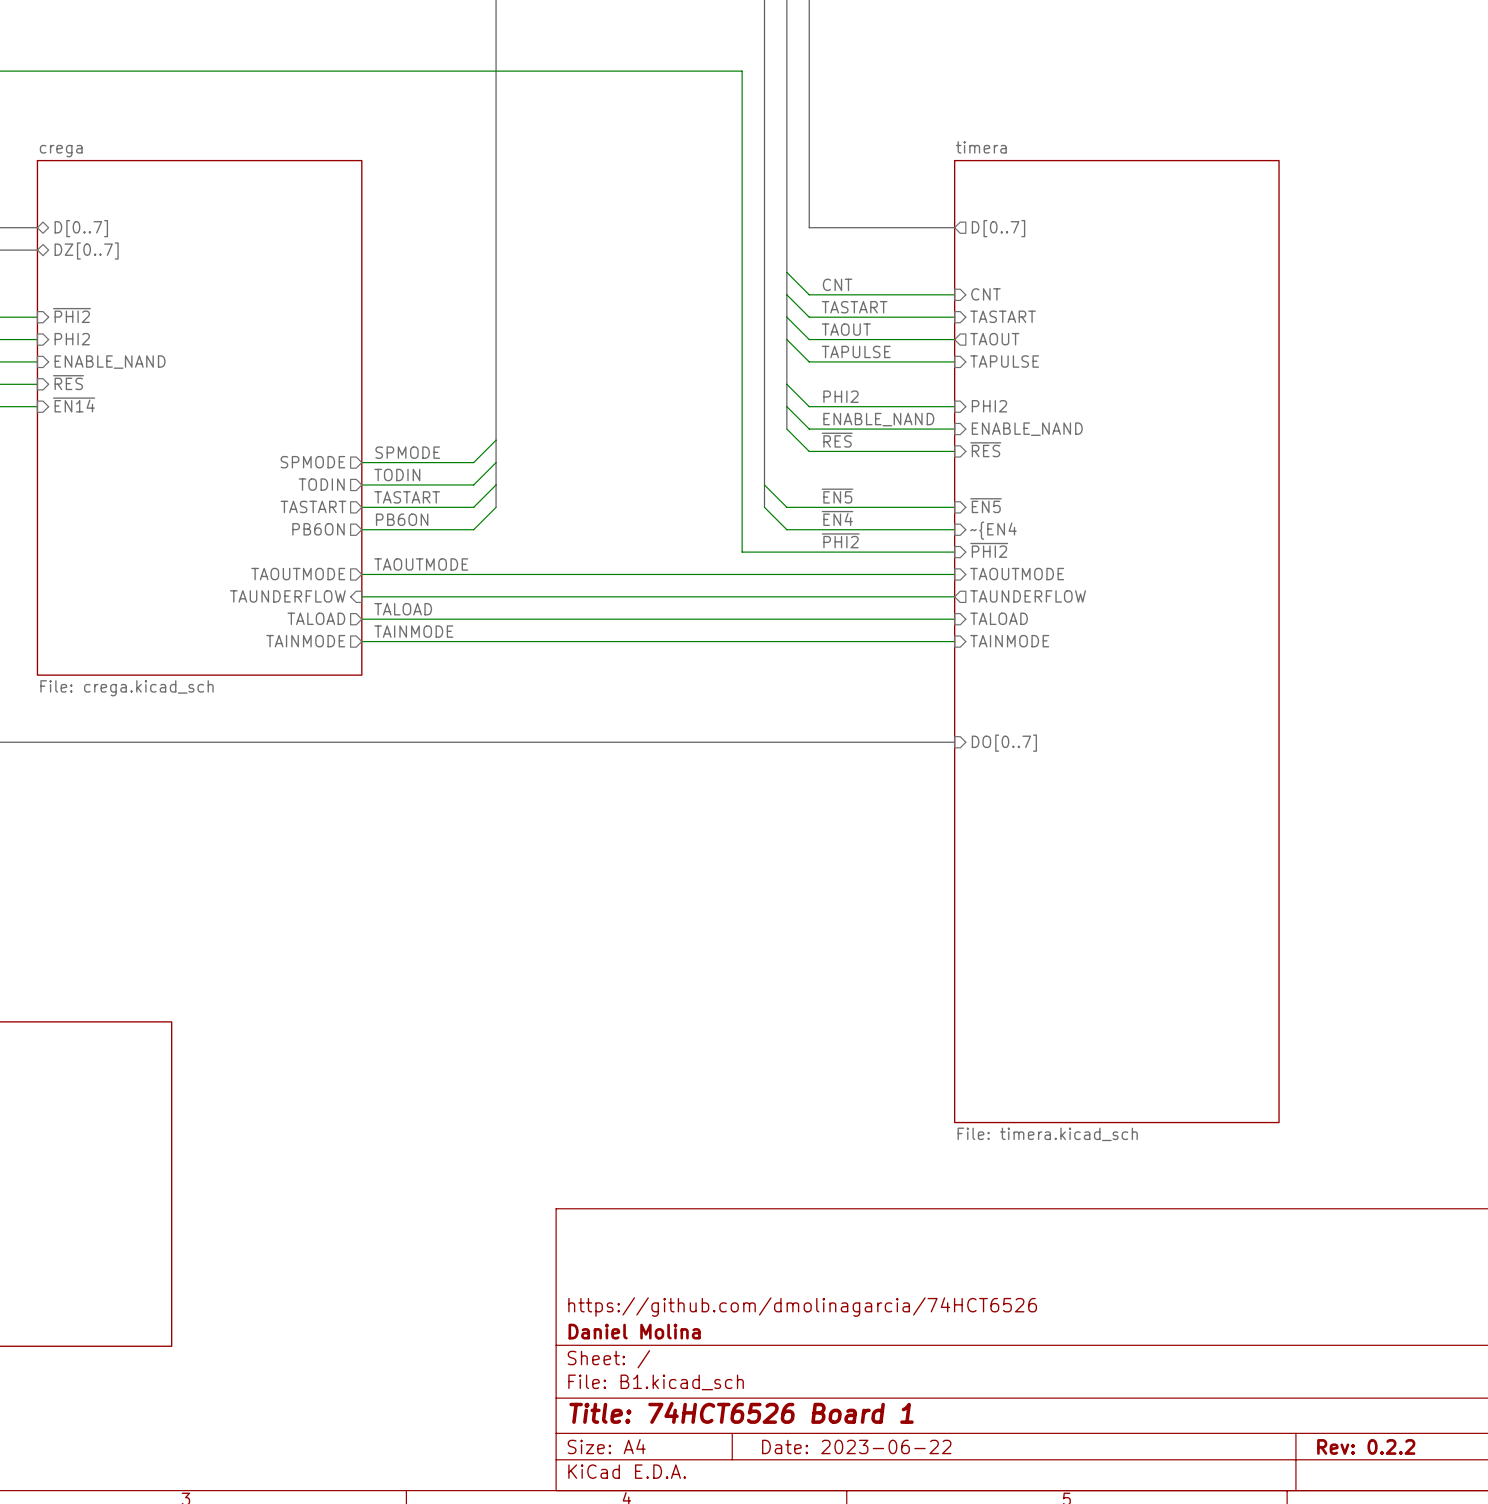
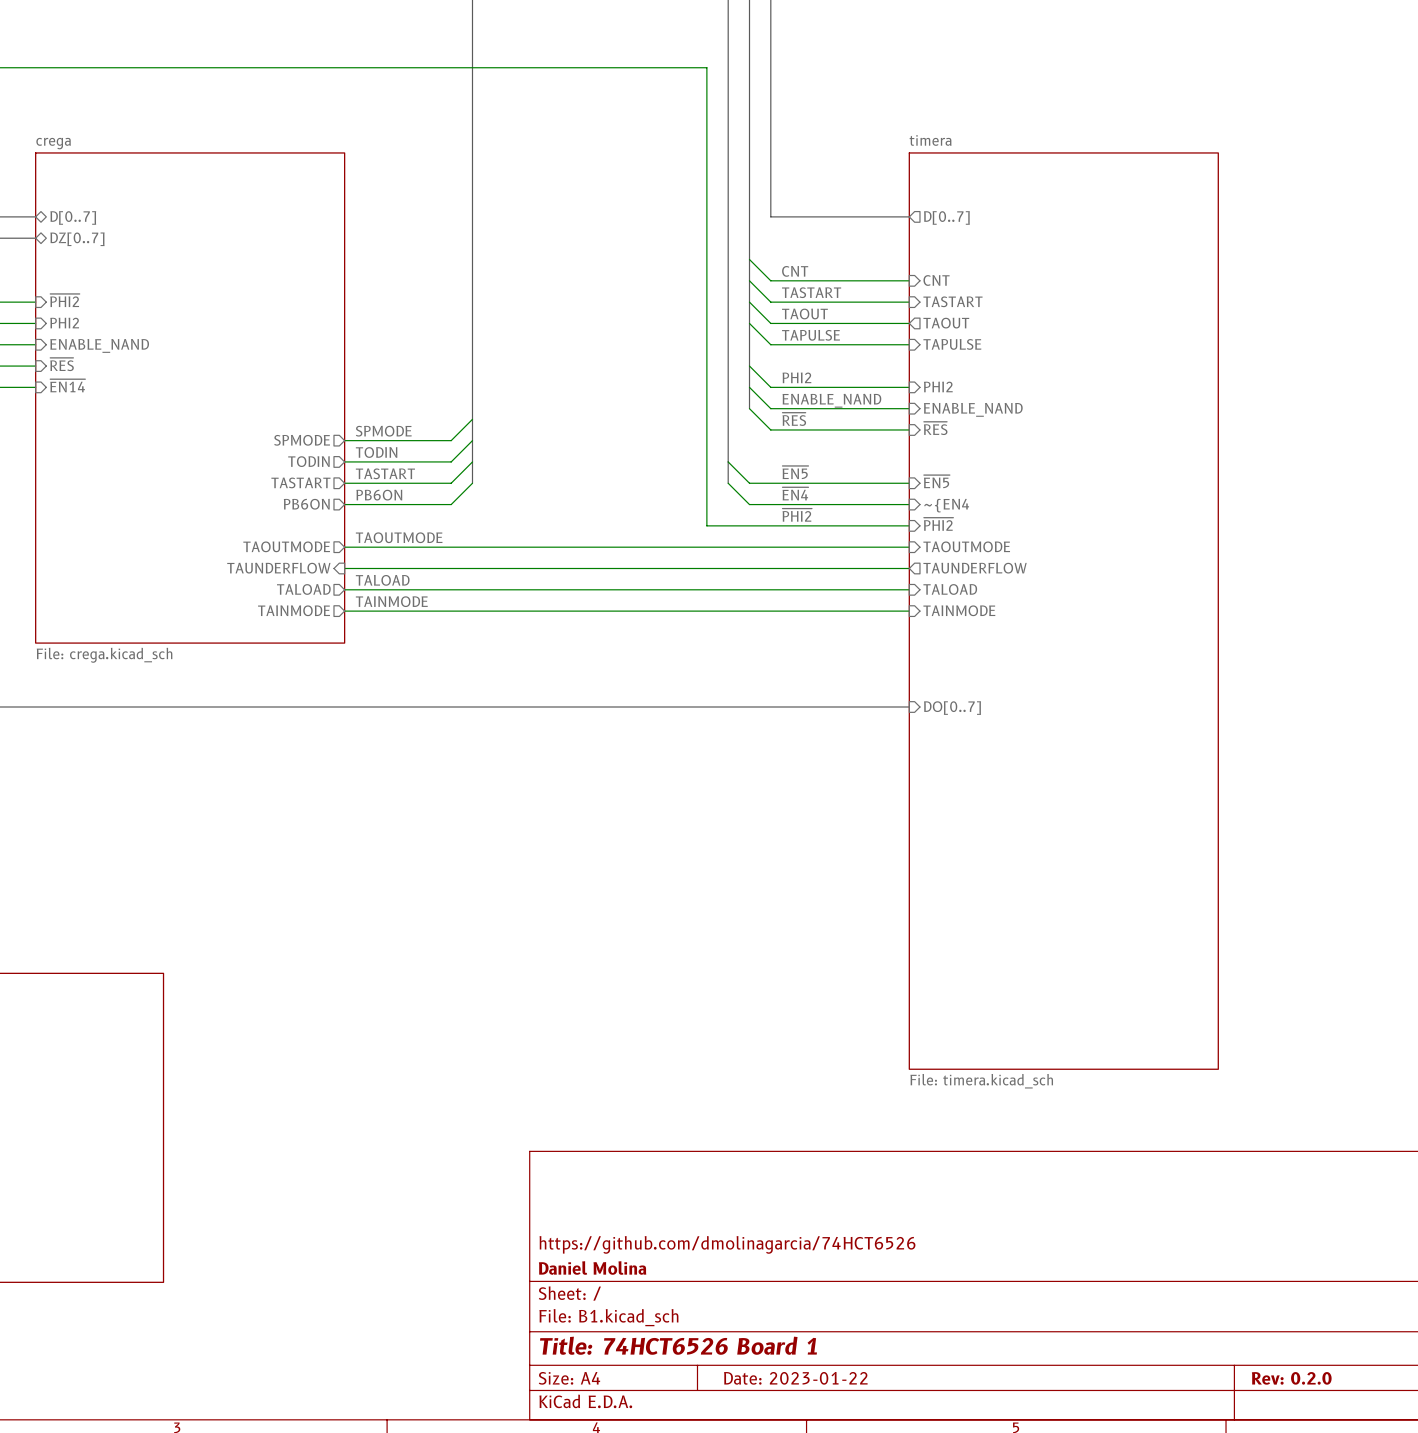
title block: Date: 2023-06-22 (856, 1446) -> Date: 2023-01-22 (795, 1378)
title block: Rev: 0.2.2 (1366, 1446) -> Rev: 0.2.0 (1291, 1378)

